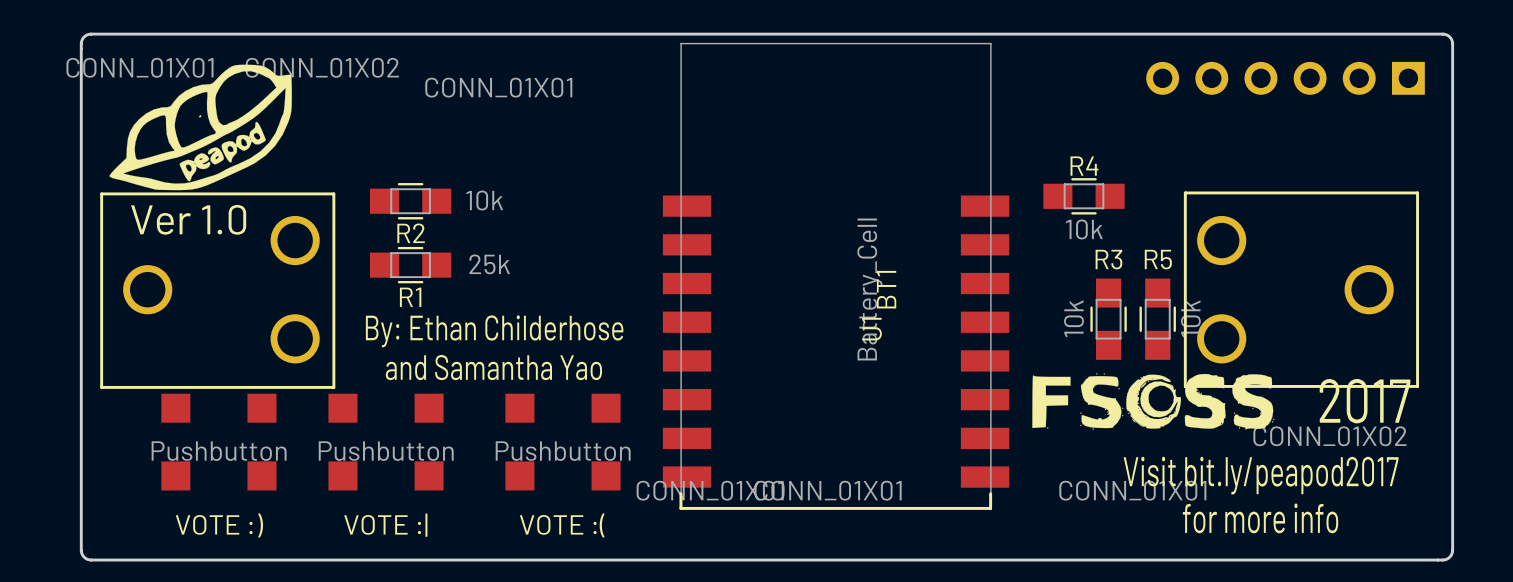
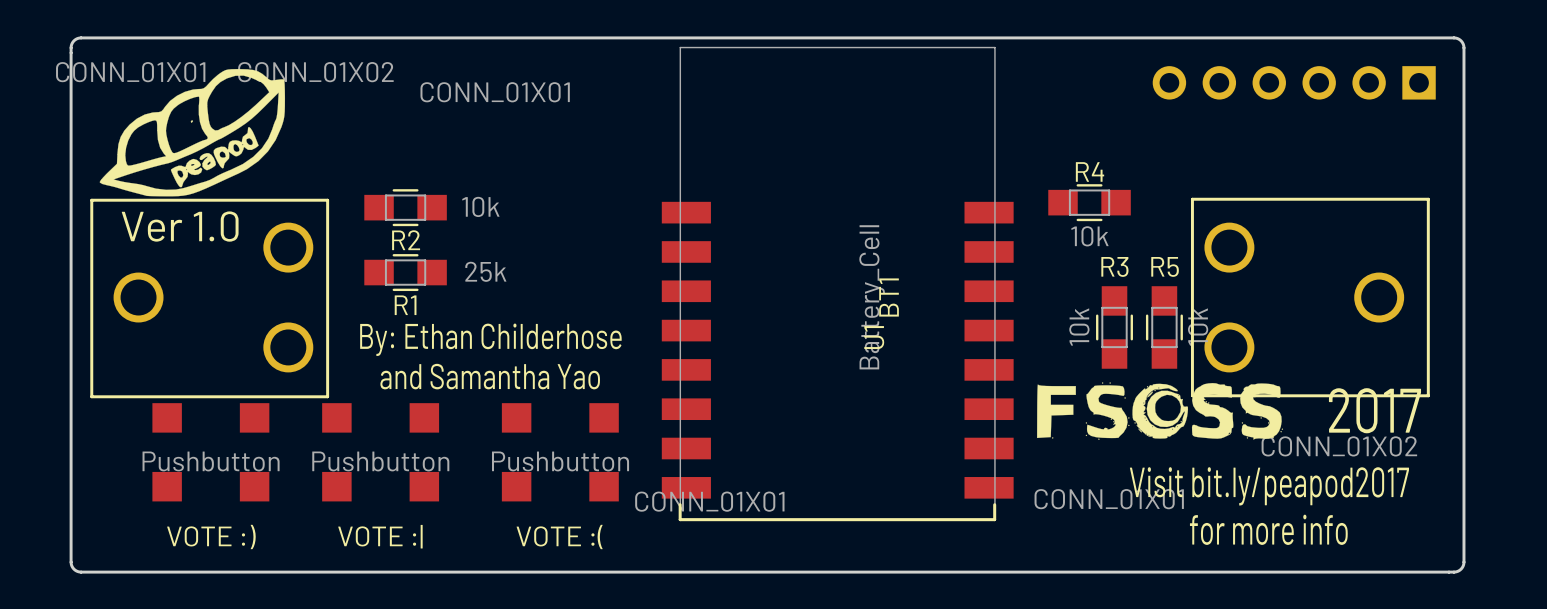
part: CONN_01X01 (828, 490) -> none
part position: (1132, 490) -> (1109, 499)

